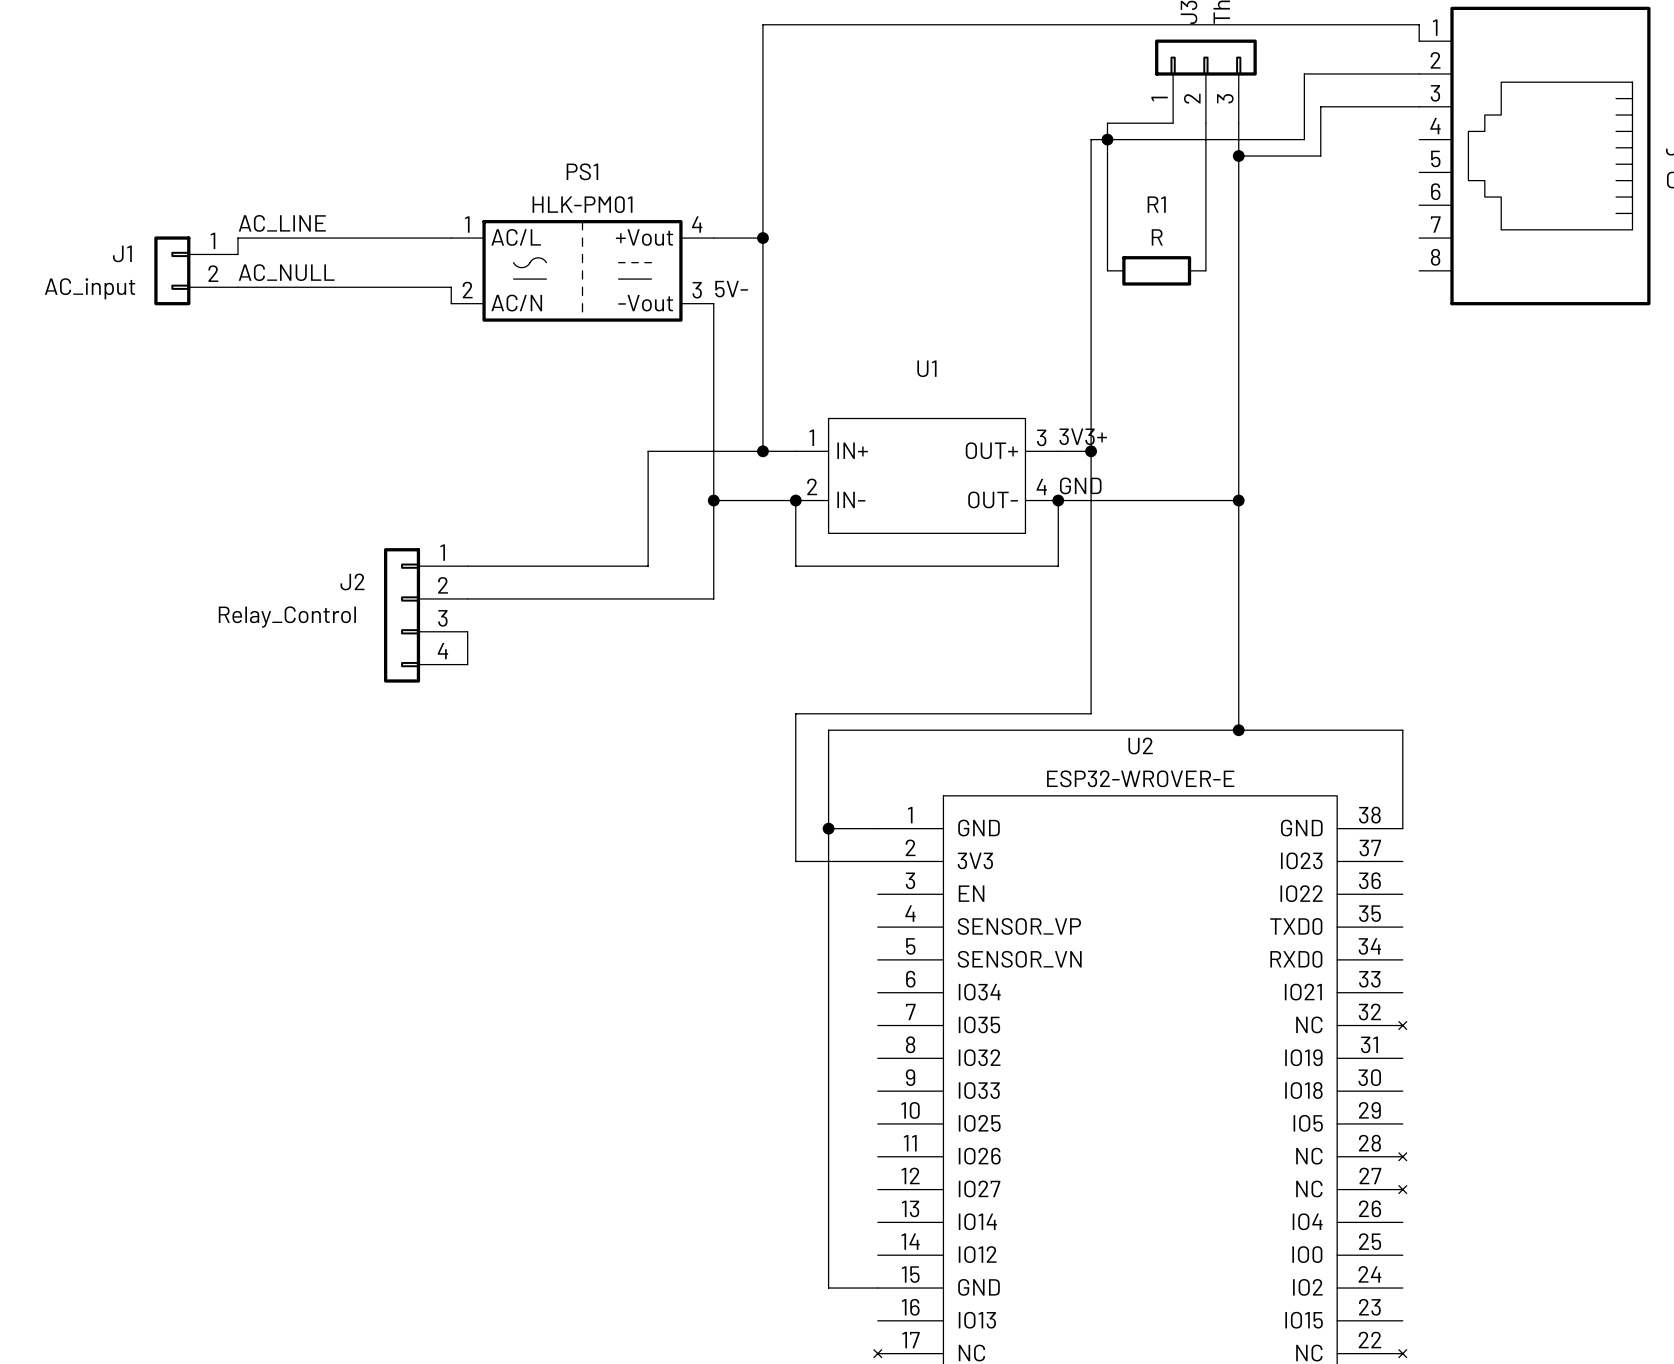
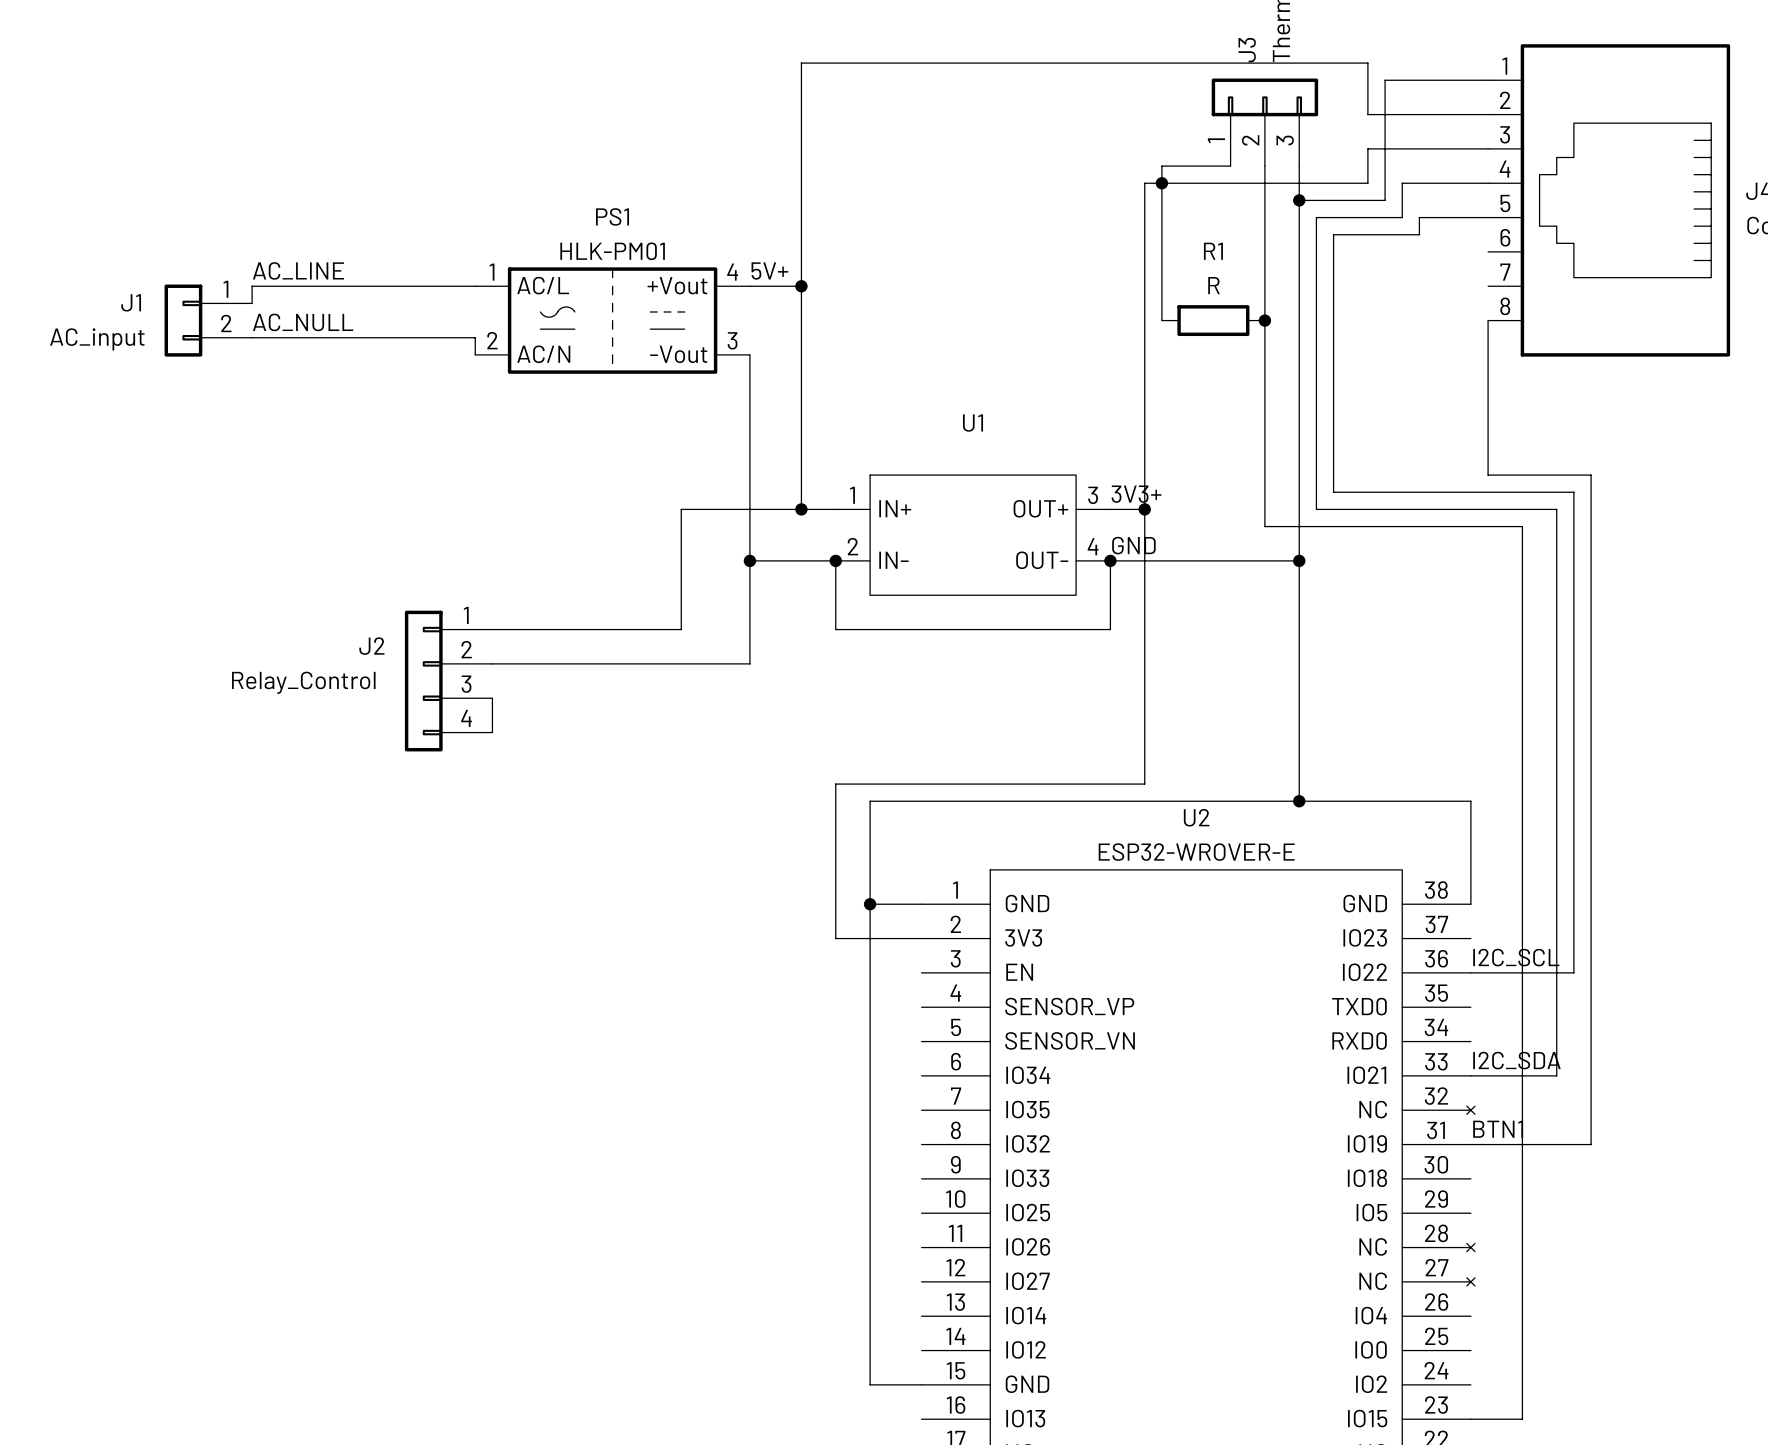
wire: (1304, 24) (1419, 24) (1419, 41) -> (1367, 148) (1385, 148) (1385, 80) (1488, 80)
wire: (1304, 73) (1304, 106) -> (1367, 114) (1367, 63)
wire: none -> (1488, 183) (1402, 183) (1402, 217) (1316, 217) (1316, 509) (1556, 509) (1556, 1075) (1470, 1075)
wire: none -> (1488, 217) (1419, 217) (1419, 234) (1333, 234) (1333, 492) (1573, 492) (1573, 972) (1470, 972)
label: none -> 5V+ (769, 271)
wire: none -> (1264, 320) (1264, 526) (1522, 526) (1522, 1419) (1470, 1419)
junction: none -> (1264, 320)
wire: none -> (1488, 320) (1488, 475) (1591, 475) (1591, 1144) (1470, 1144)
label: 5V- (731, 289) -> none
label: none -> I2C_SCL (1516, 957)
label: none -> I2C_SDA (1516, 1060)
label: none -> BTN1 (1498, 1129)

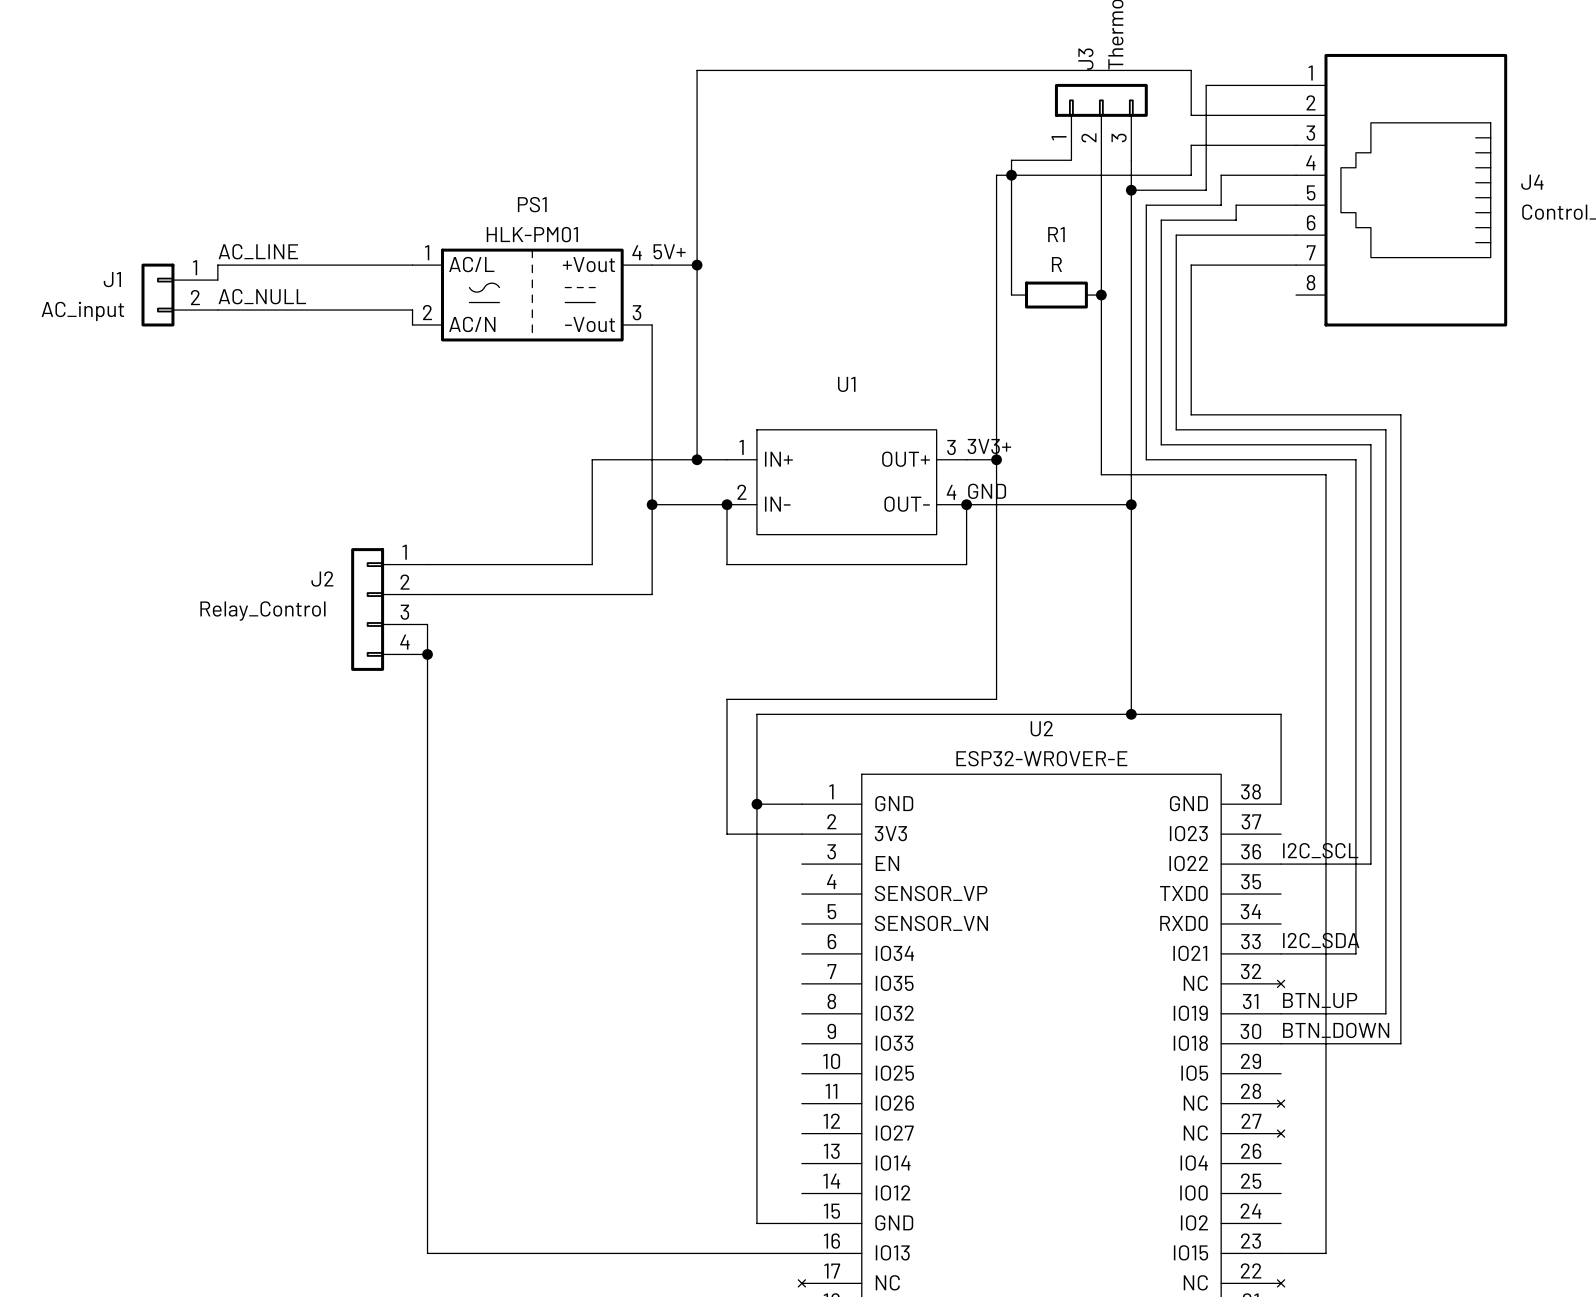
wire: none -> (1296, 265) (1191, 265) (1191, 414) (1400, 414) (1400, 1043) (1281, 1043)
wire: (1488, 320) (1488, 475) -> (1296, 235) (1176, 235) (1176, 429) (1296, 429)
wire: none -> (427, 654) (427, 1253) (801, 1253)
junction: none -> (427, 654)
label: BTN1 (1498, 1129) -> BTN_UP (1320, 1000)
label: none -> BTN_DOWN (1336, 1030)

